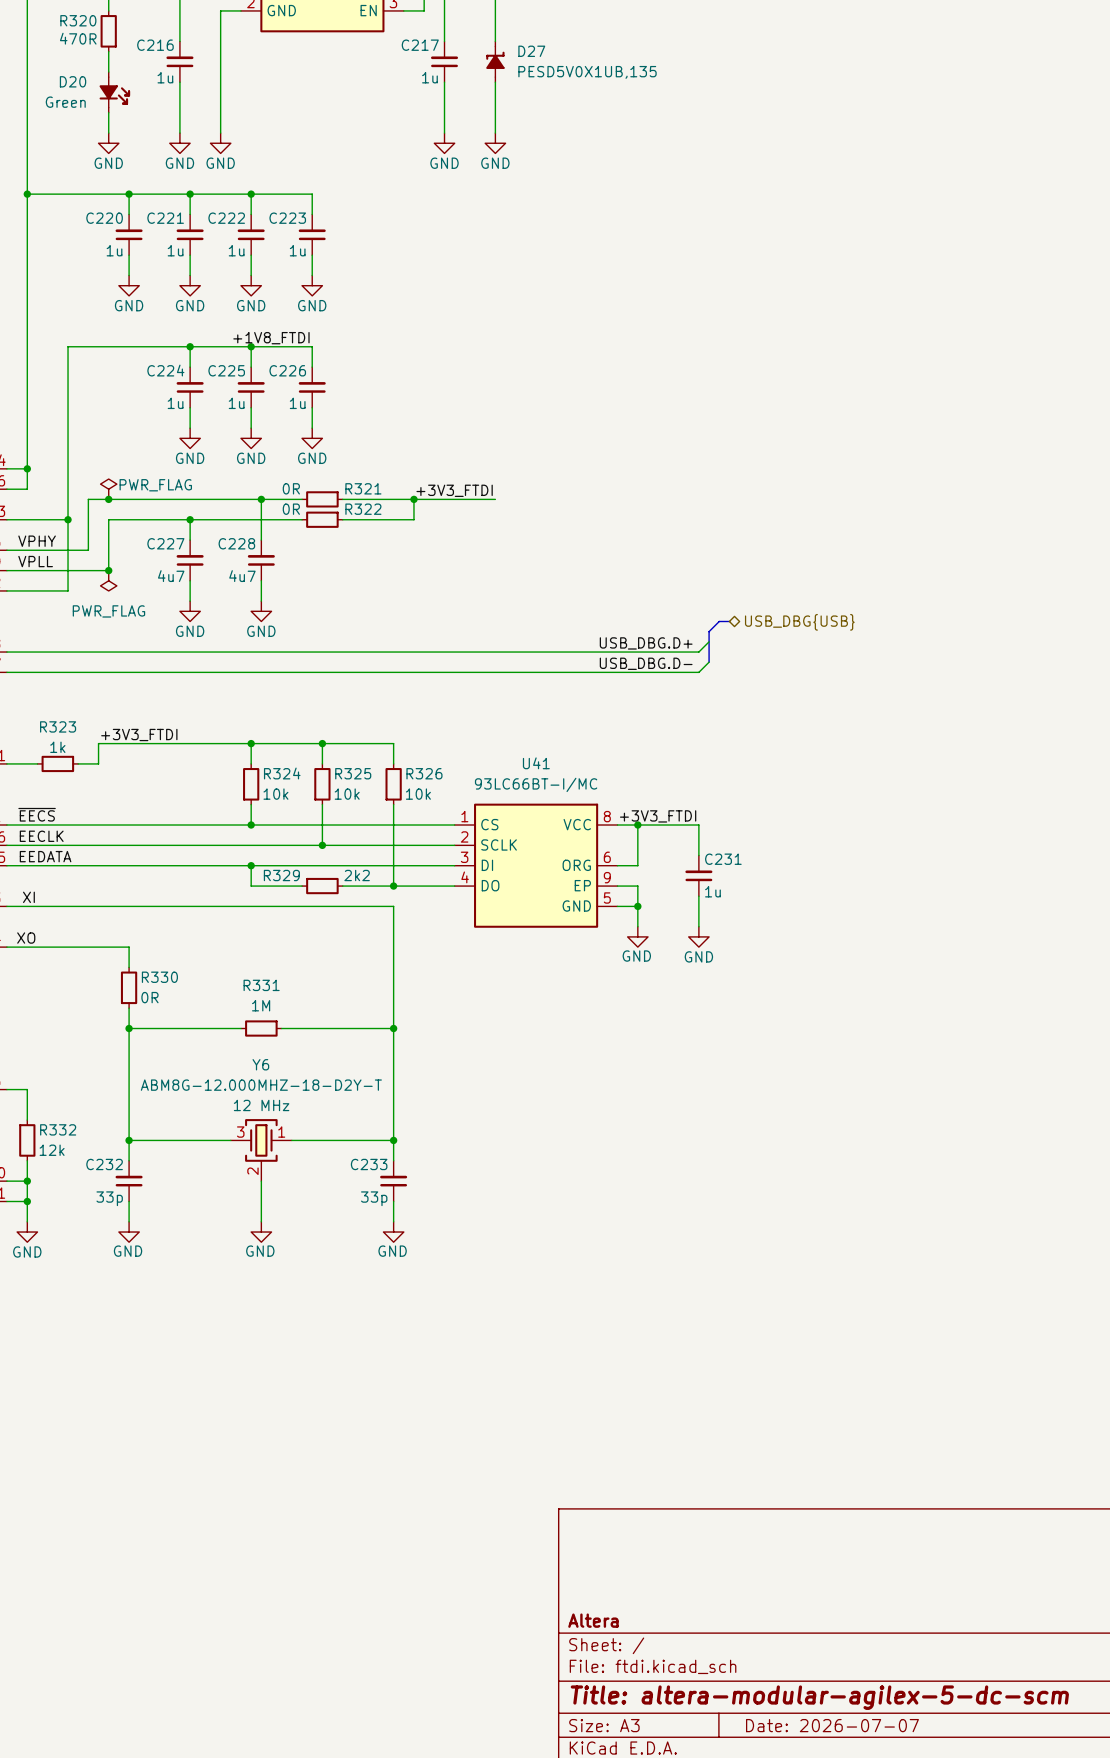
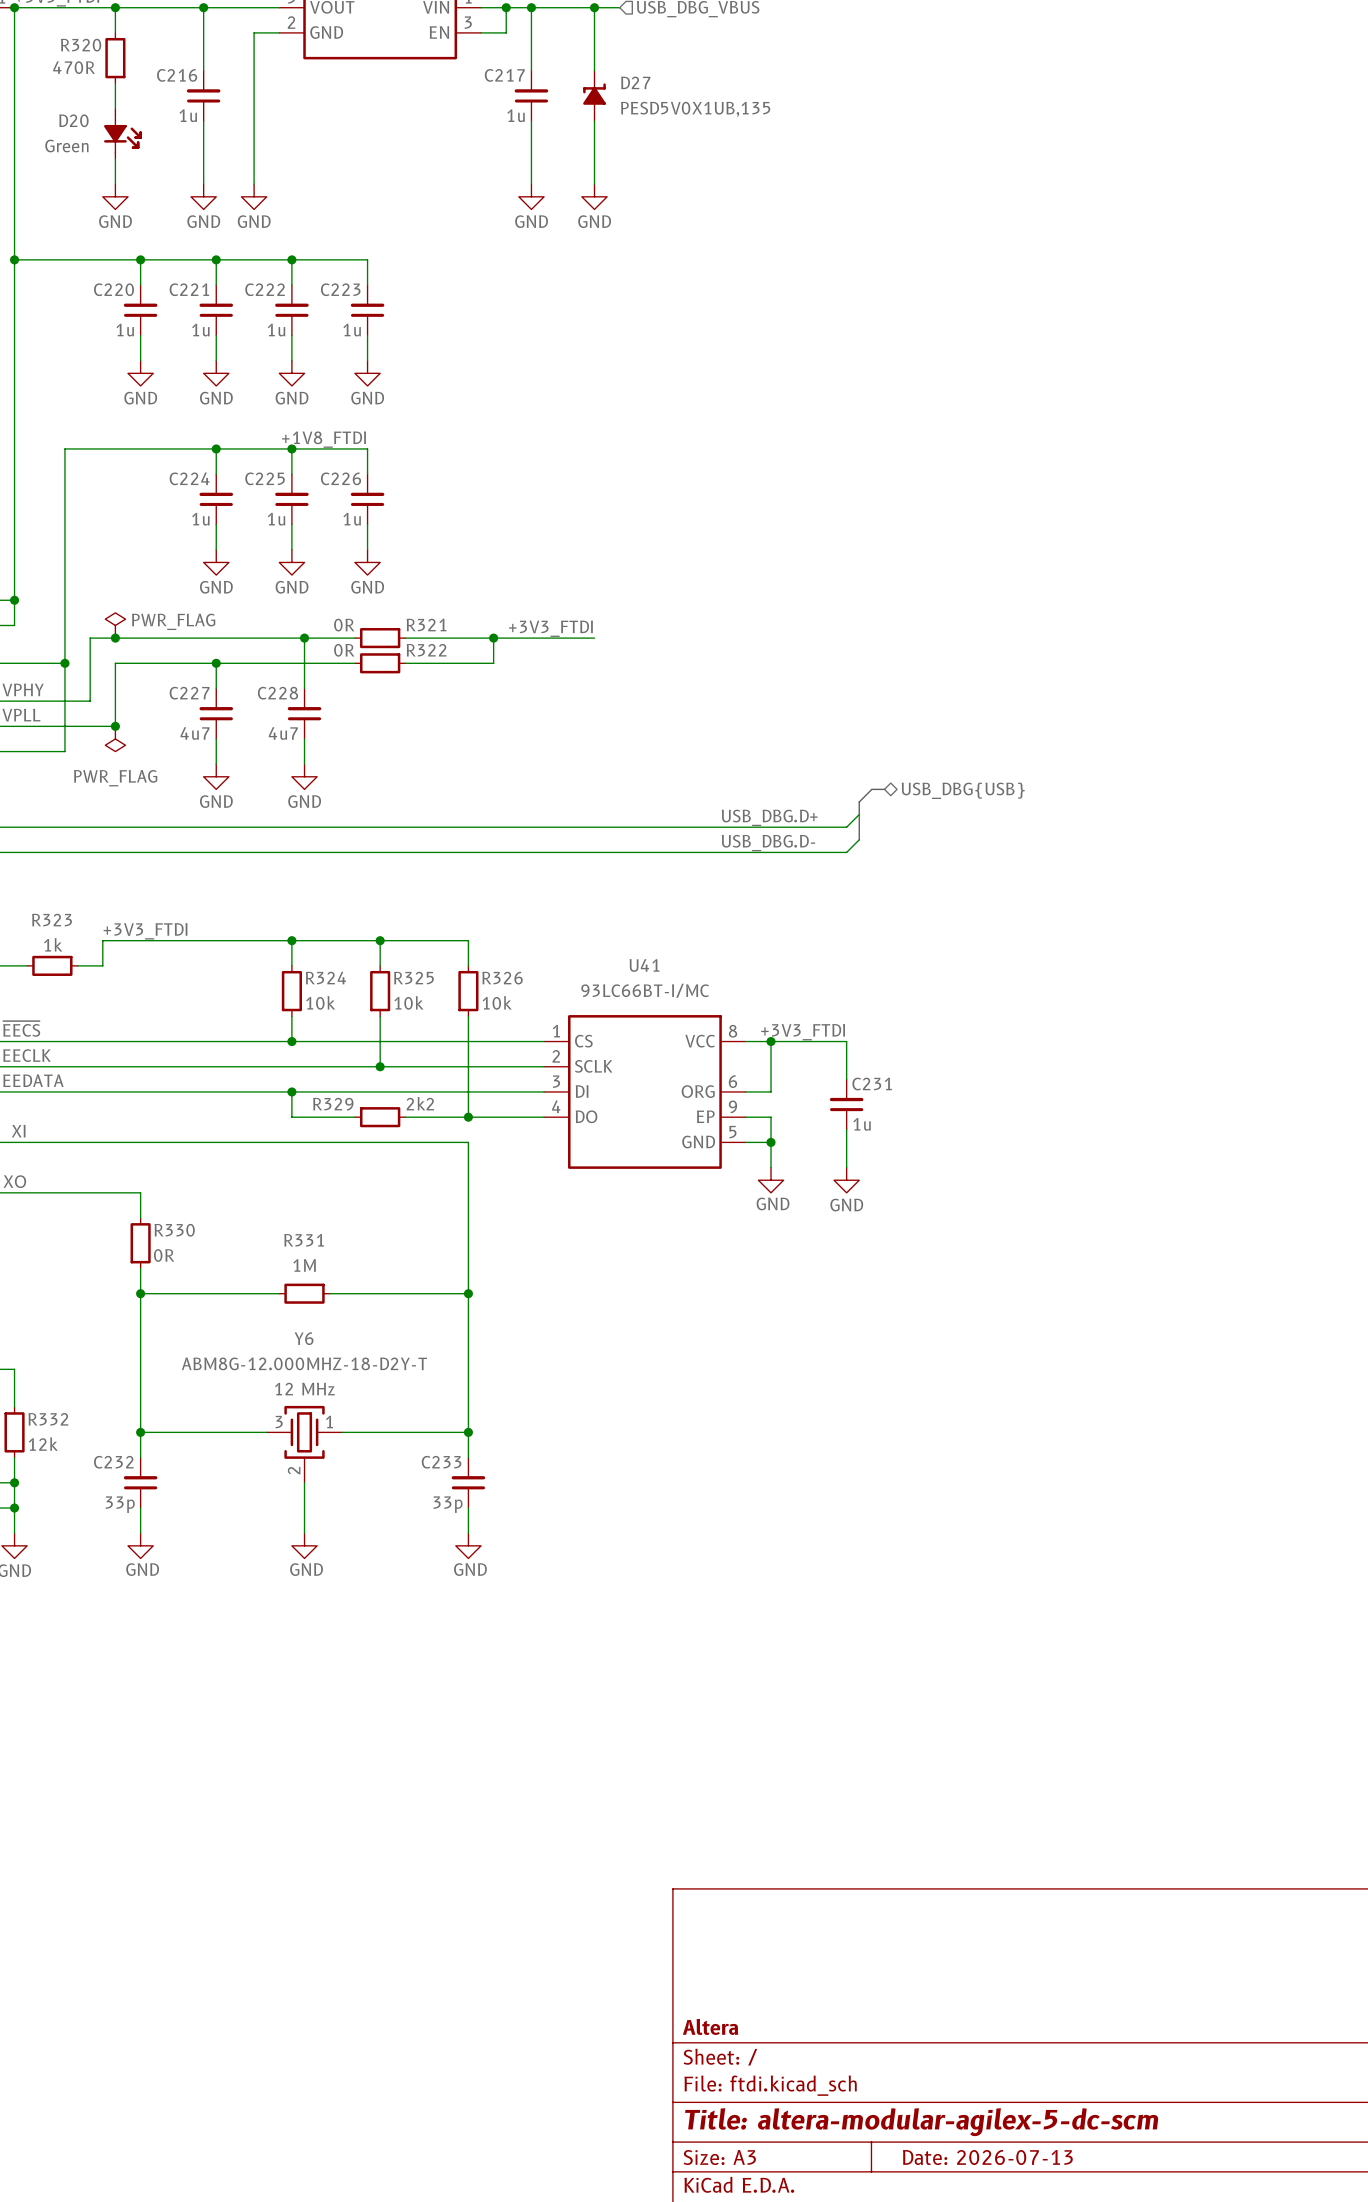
title block: Date: 2026-07-07 (832, 1725) -> Date: 2026-07-13 (987, 2157)

